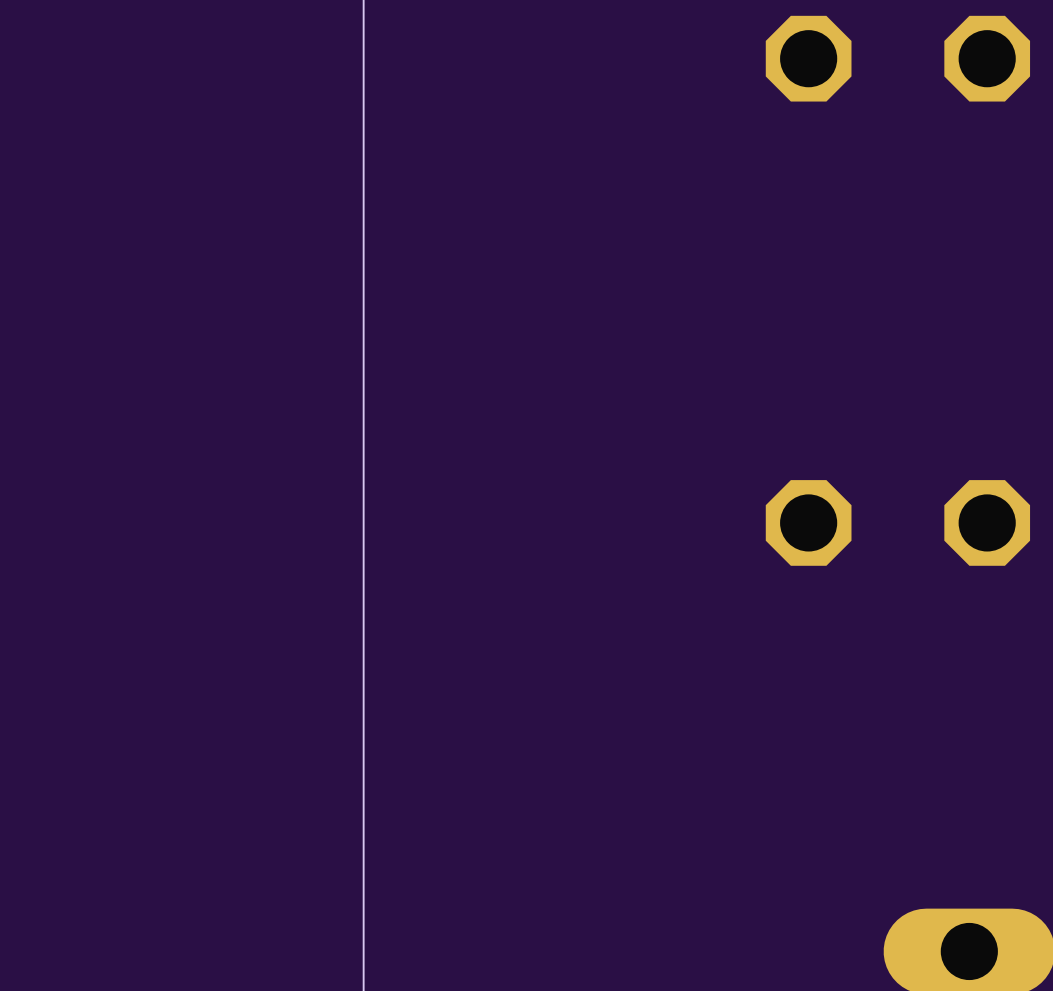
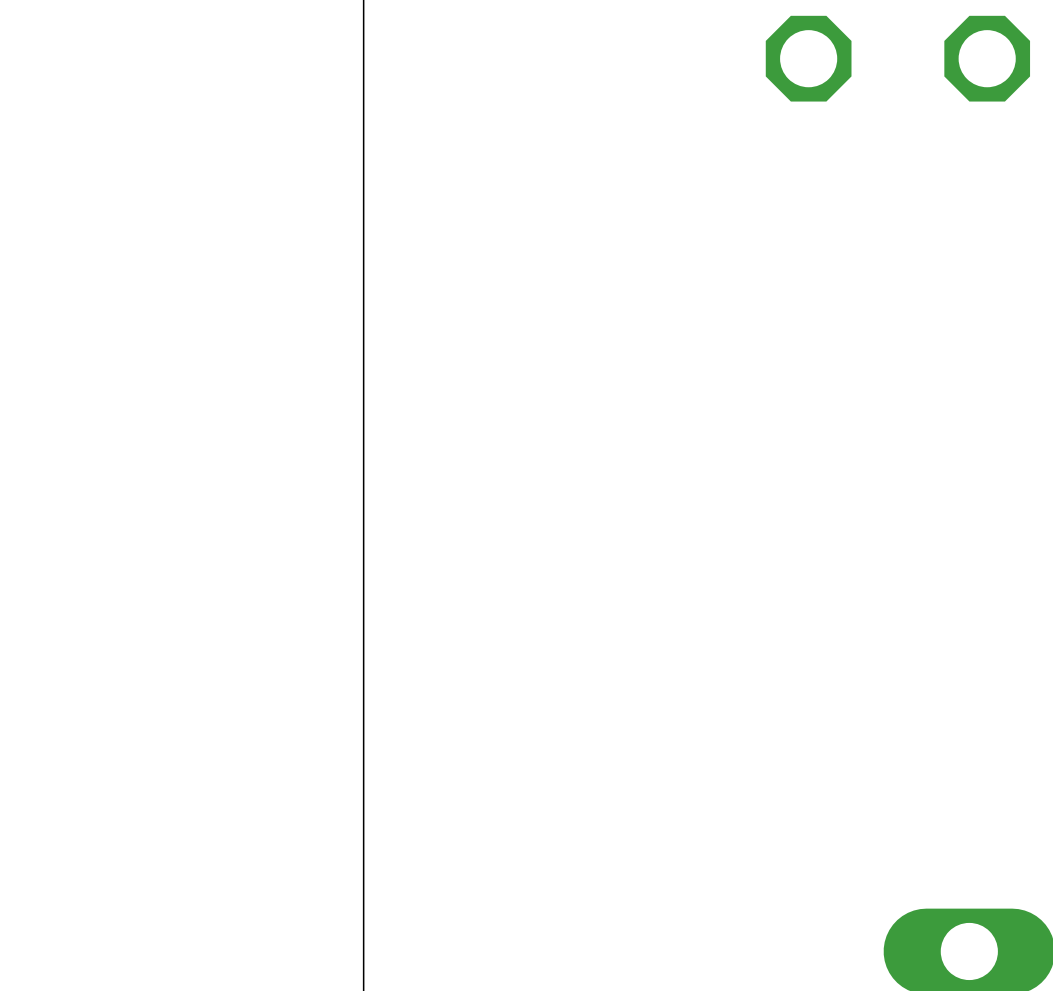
part: (897, 522) -> none

